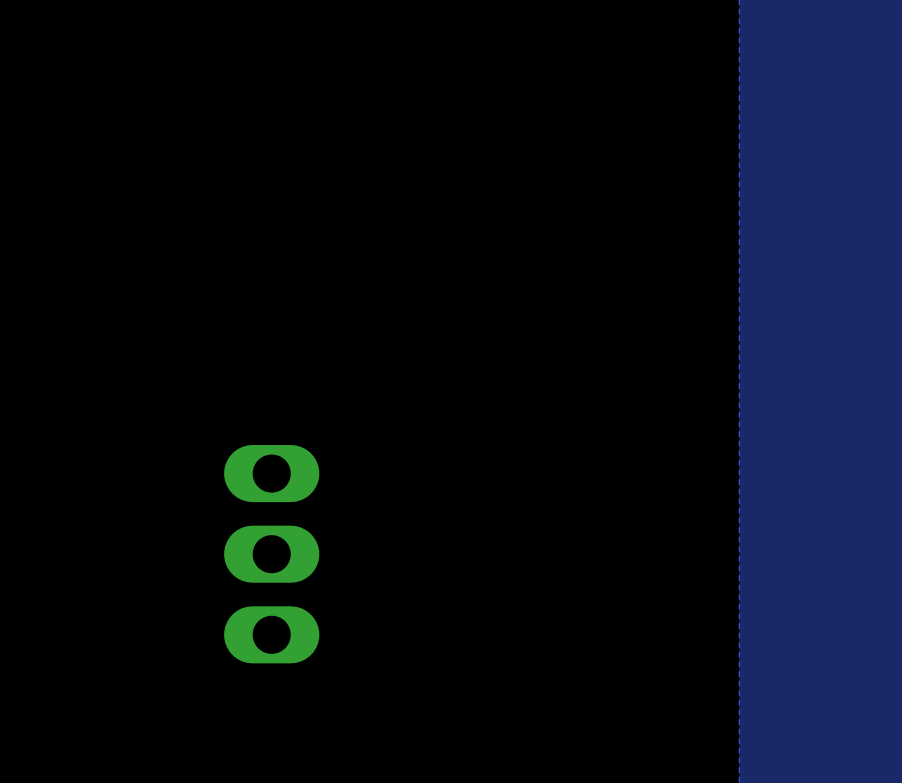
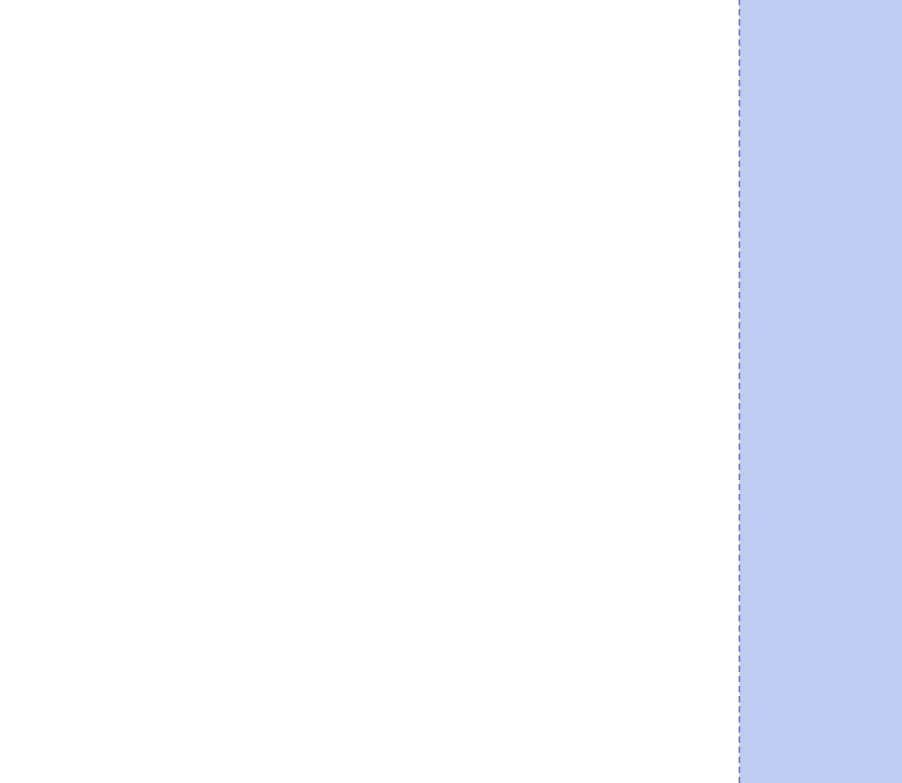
part: (271, 554) -> none

